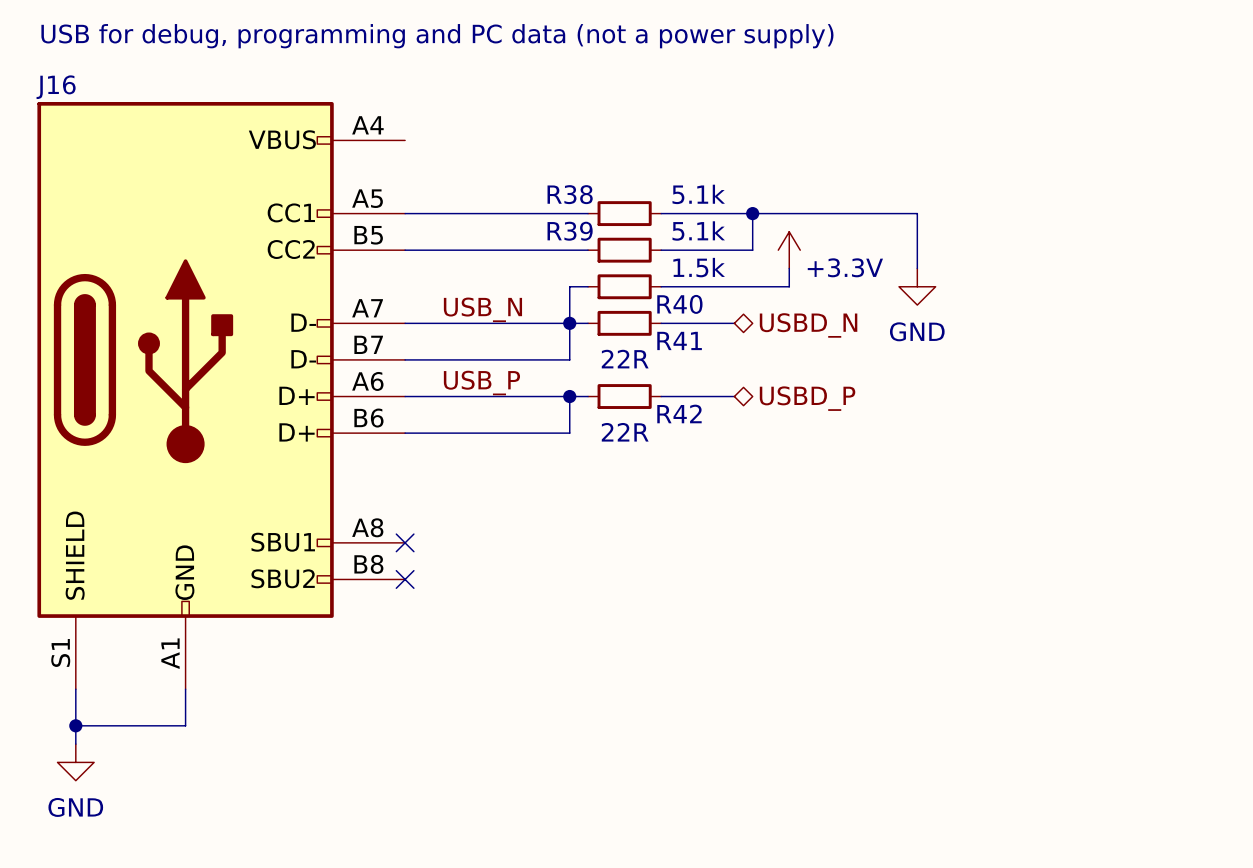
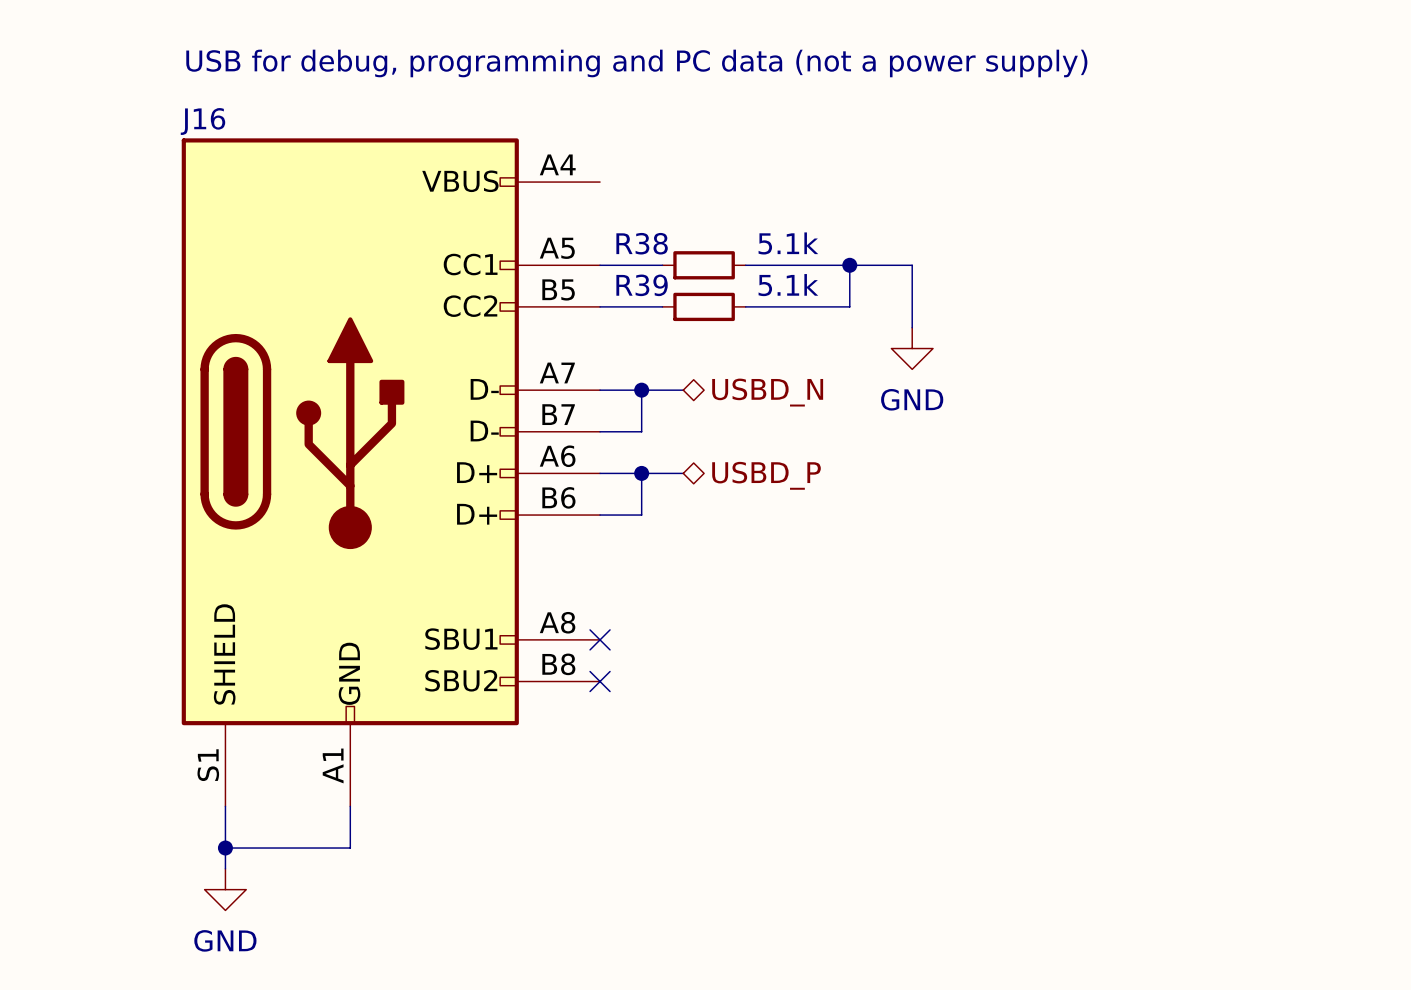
text position: USB for debug, programming and PC data (not a power supply) (437, 36) -> USB for debug, programming and PC data (not a power supply) (636, 63)
wire: (807, 213) (917, 213) (917, 268) -> (912, 265) (912, 327)
power symbol: +3.3V (789, 250) -> none
wire: (789, 268) (789, 286) (661, 286) -> none
wire: (588, 286) (569, 286) (569, 323) -> none
R40: 1.5k (624, 286) -> none
power symbol position: GND (917, 286) -> GND (912, 348)
label: USB_N (482, 309) -> none
R41: 22R (624, 323) -> none
wire: (661, 323) (734, 323) -> none
hierarchical label position: USBD_N (808, 325) -> USBD_N (767, 392)
label: USB_P (481, 383) -> none
J16 position: (221, 395) -> (390, 472)
R42: 22R (624, 396) -> none
wire: (661, 396) (734, 396) -> none
hierarchical label position: USBD_P (807, 398) -> USBD_P (766, 475)
no-connect mark: (405, 542) -> none
no-connect mark: none -> (600, 639)
no-connect mark: (405, 579) -> none
no-connect mark: none -> (600, 681)
wire: (75, 689) (75, 744) -> (225, 806) (225, 868)
wire: (185, 689) (185, 725) (75, 725) -> (350, 806) (350, 848) (225, 848)
junction: (75, 725) -> none
junction: none -> (225, 848)
power symbol position: GND (75, 762) -> GND (225, 889)

